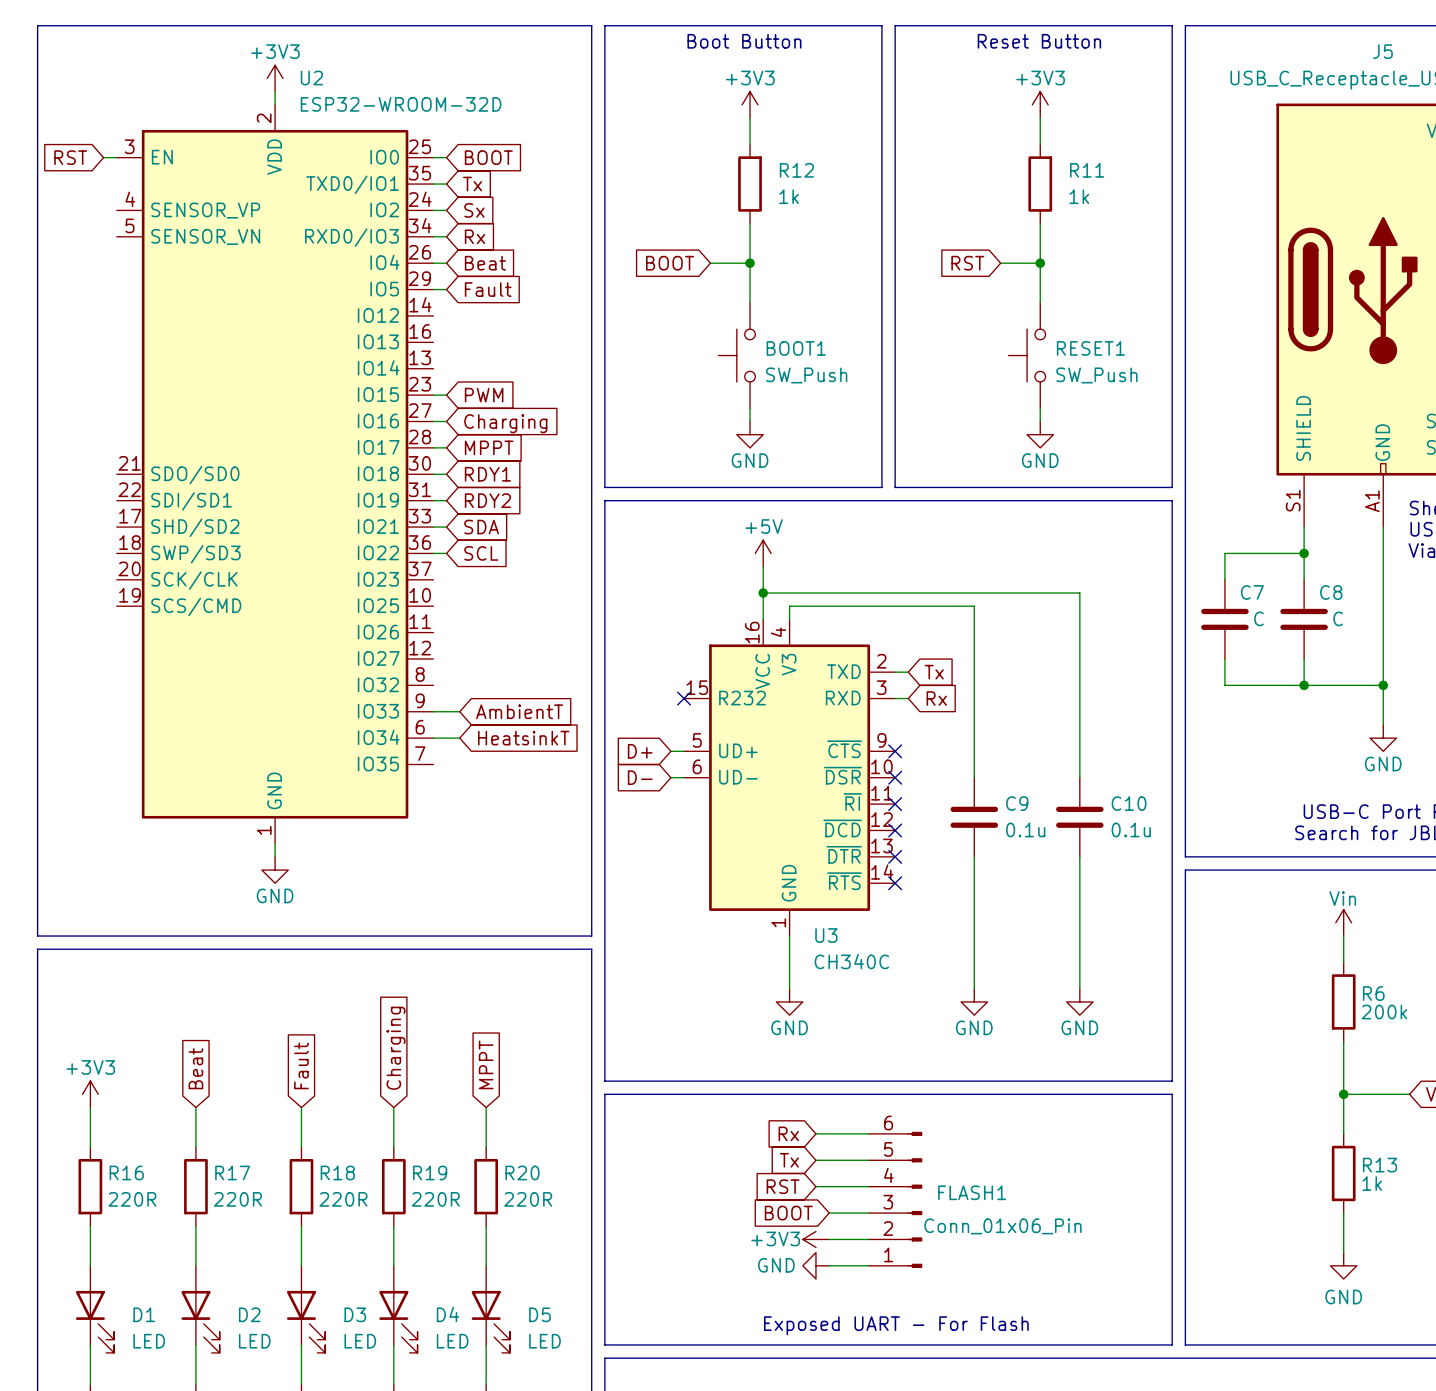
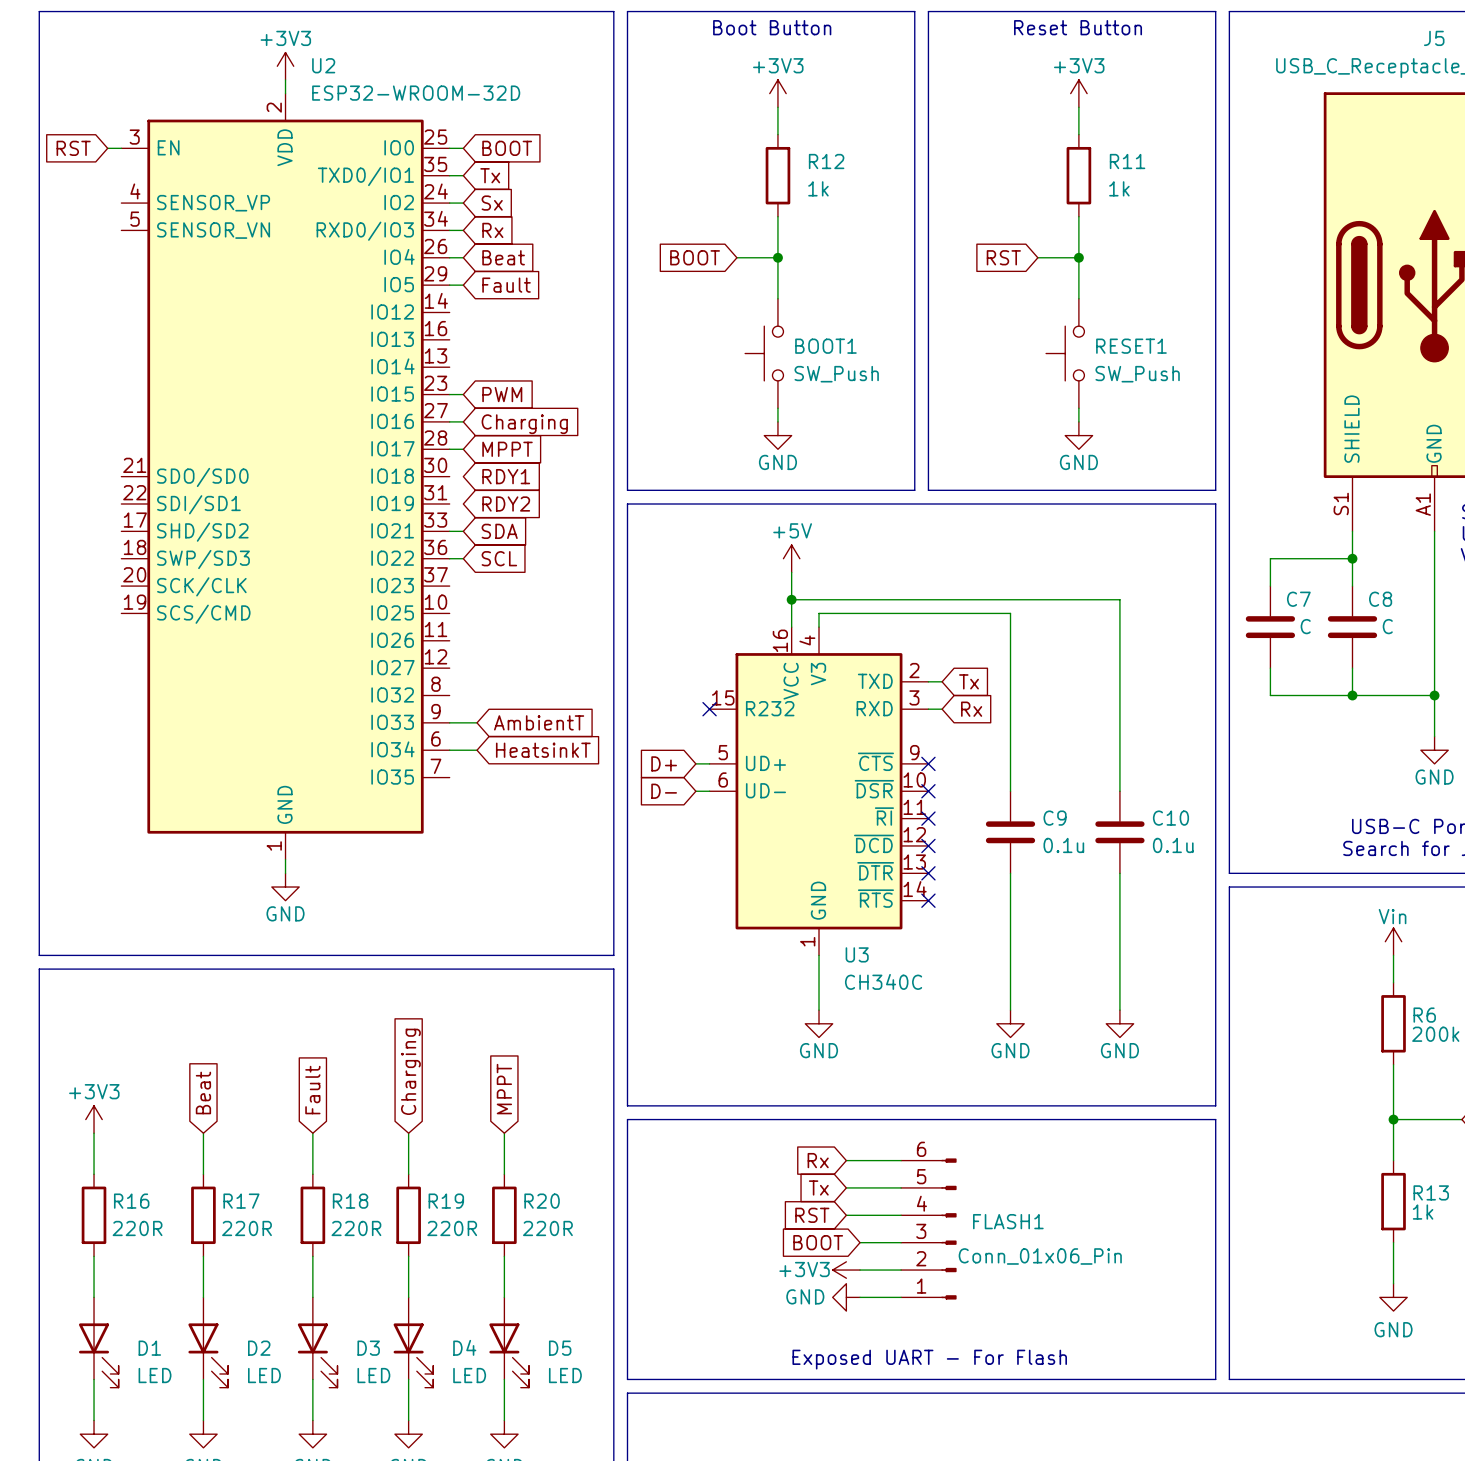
wire: (433, 474) (446, 474) -> none
wire: (433, 500) (446, 500) -> none

